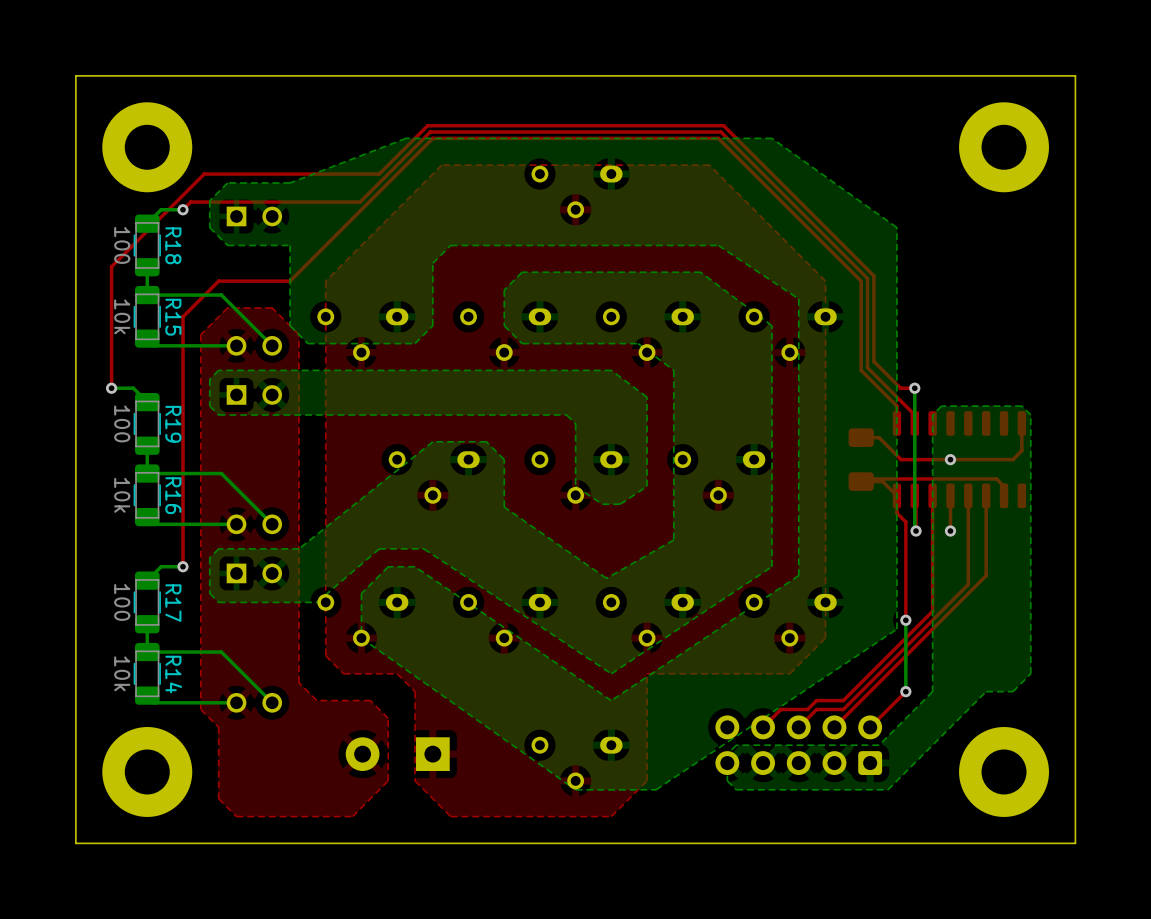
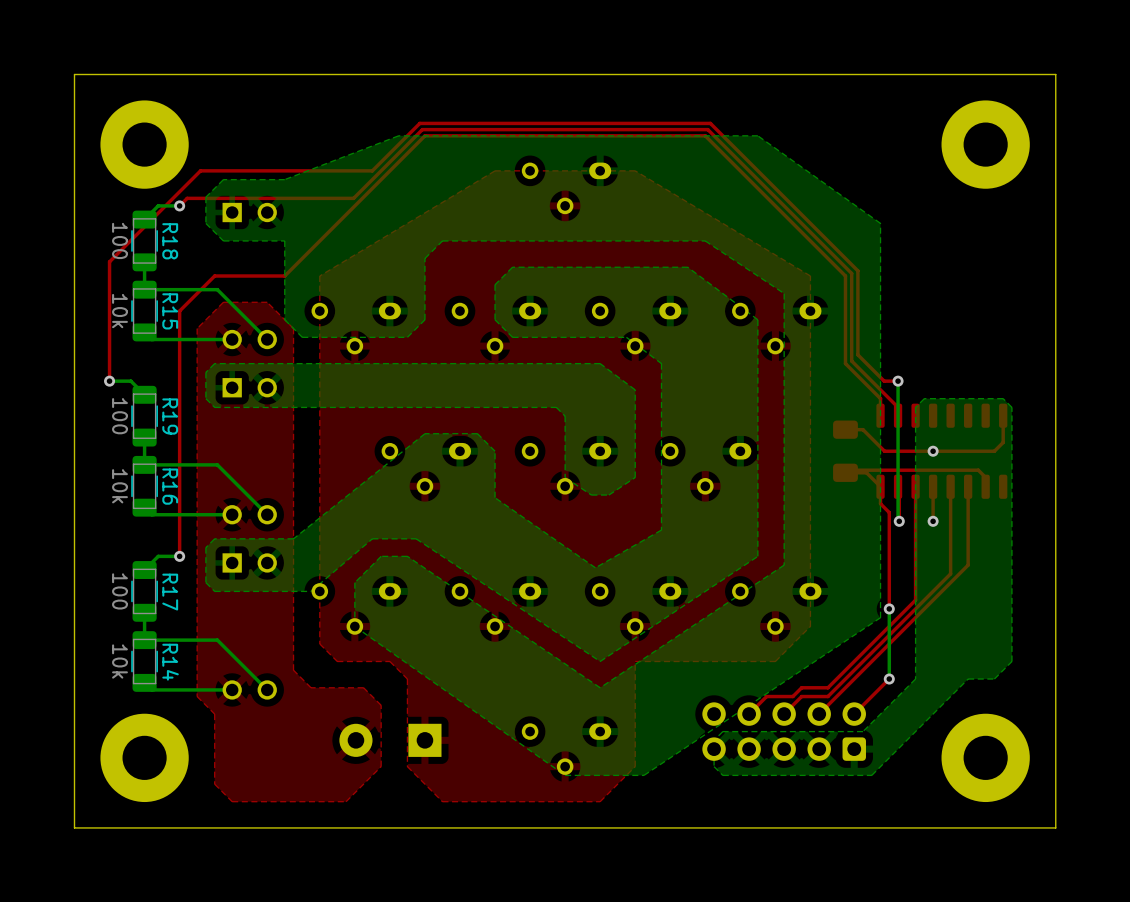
top zone outline: (825, 281) (709, 165) (441, 165) (325, 281) -> (810, 276) (635, 170) (495, 170) (319, 276)

